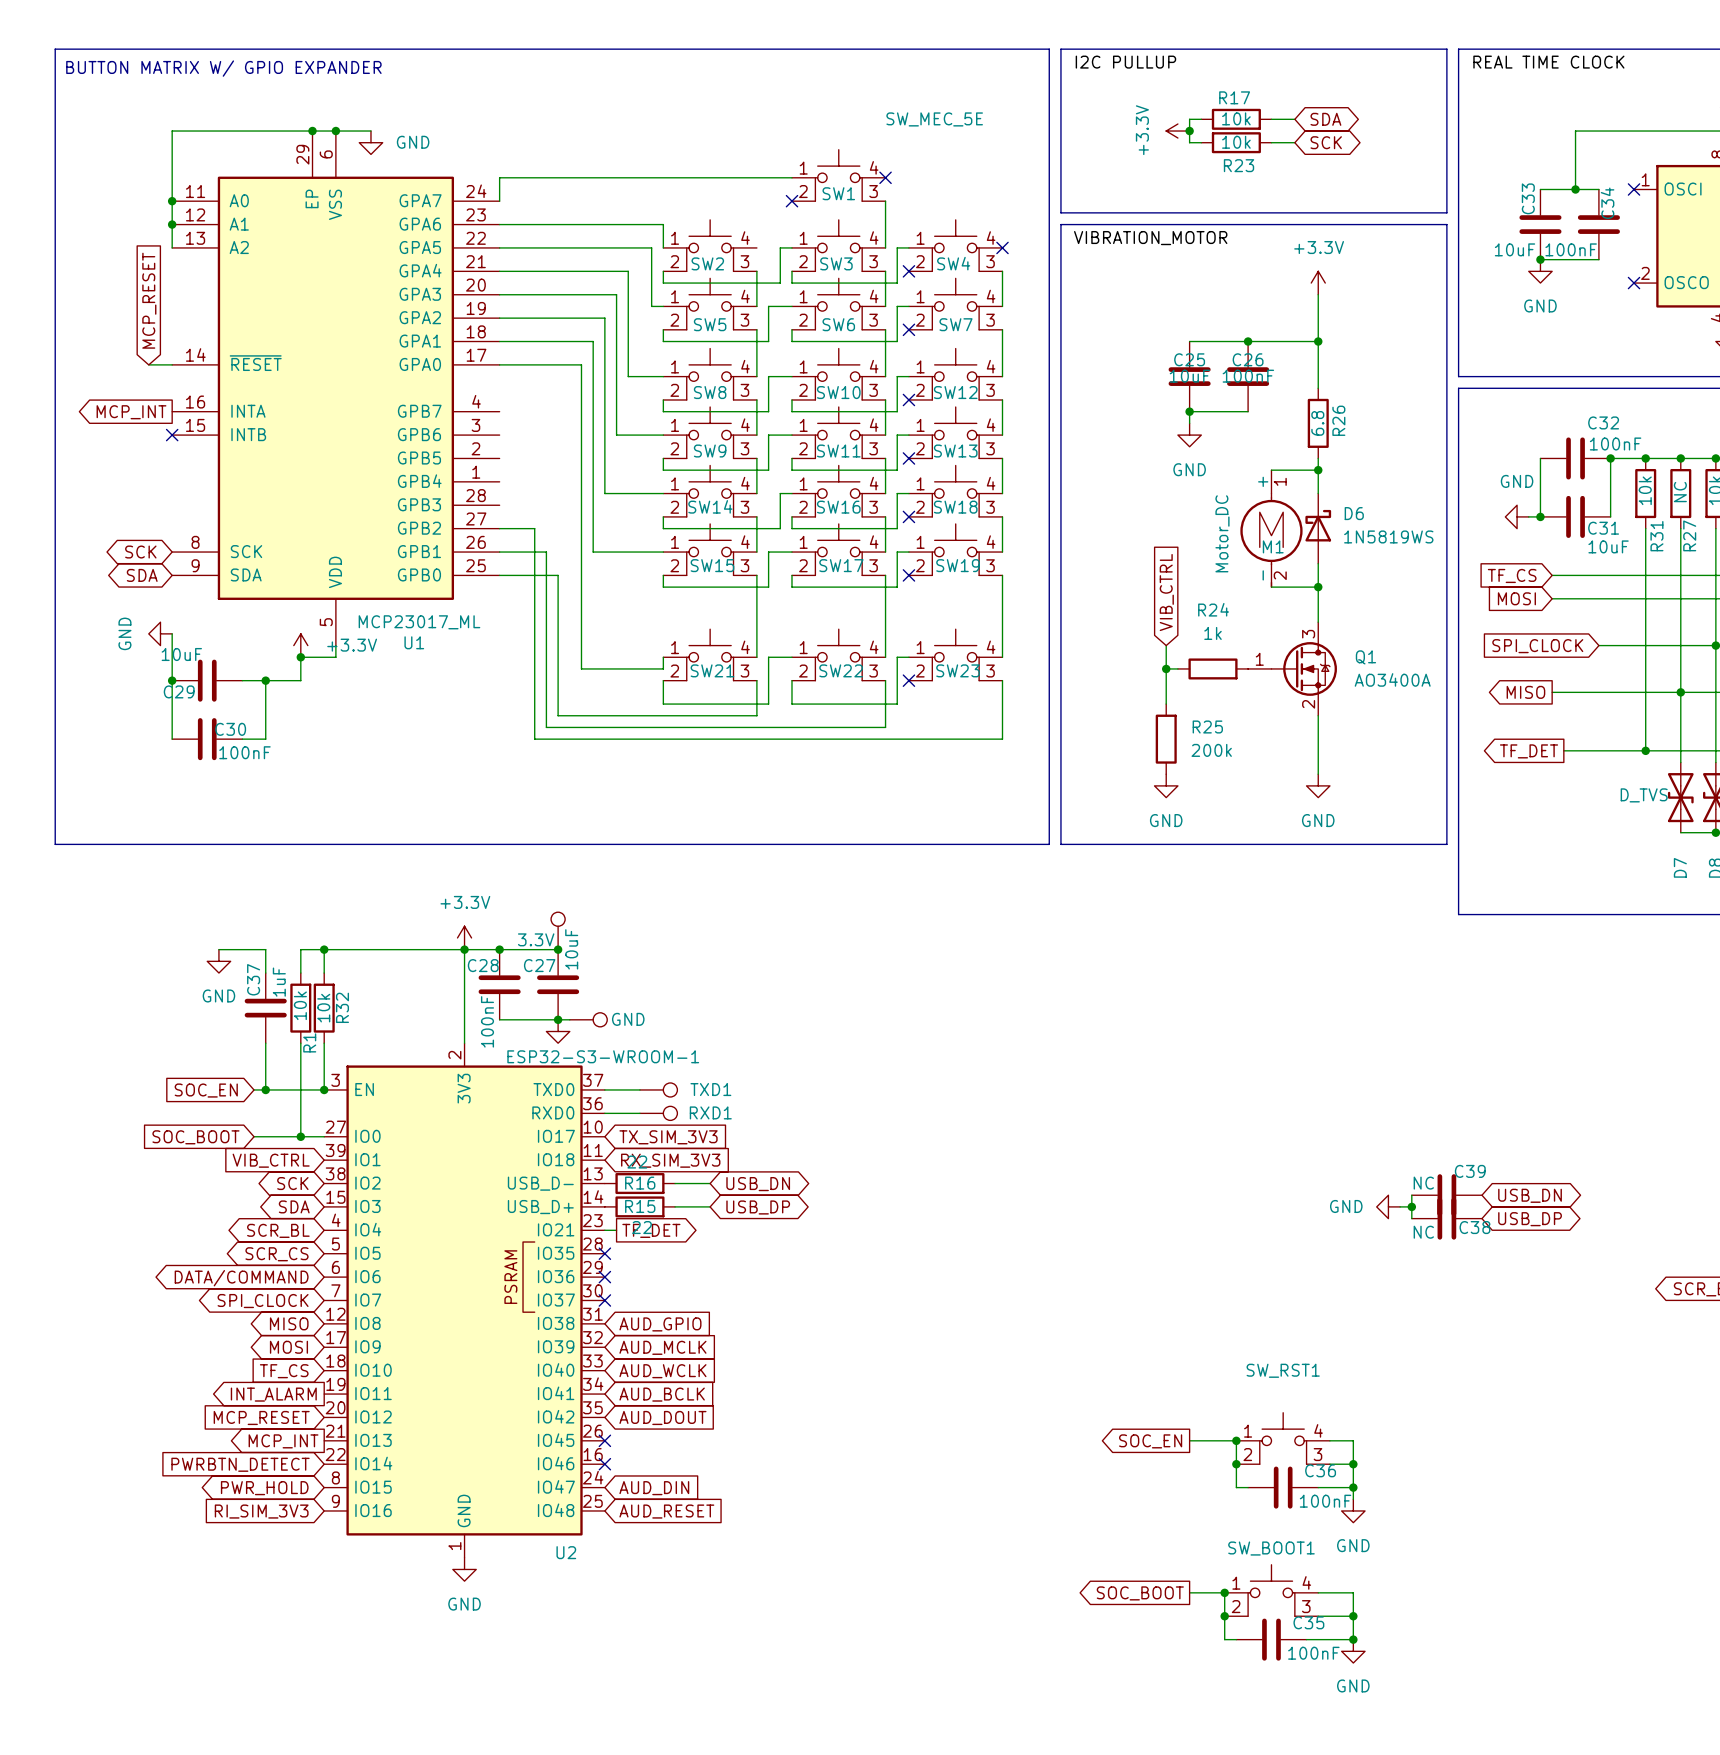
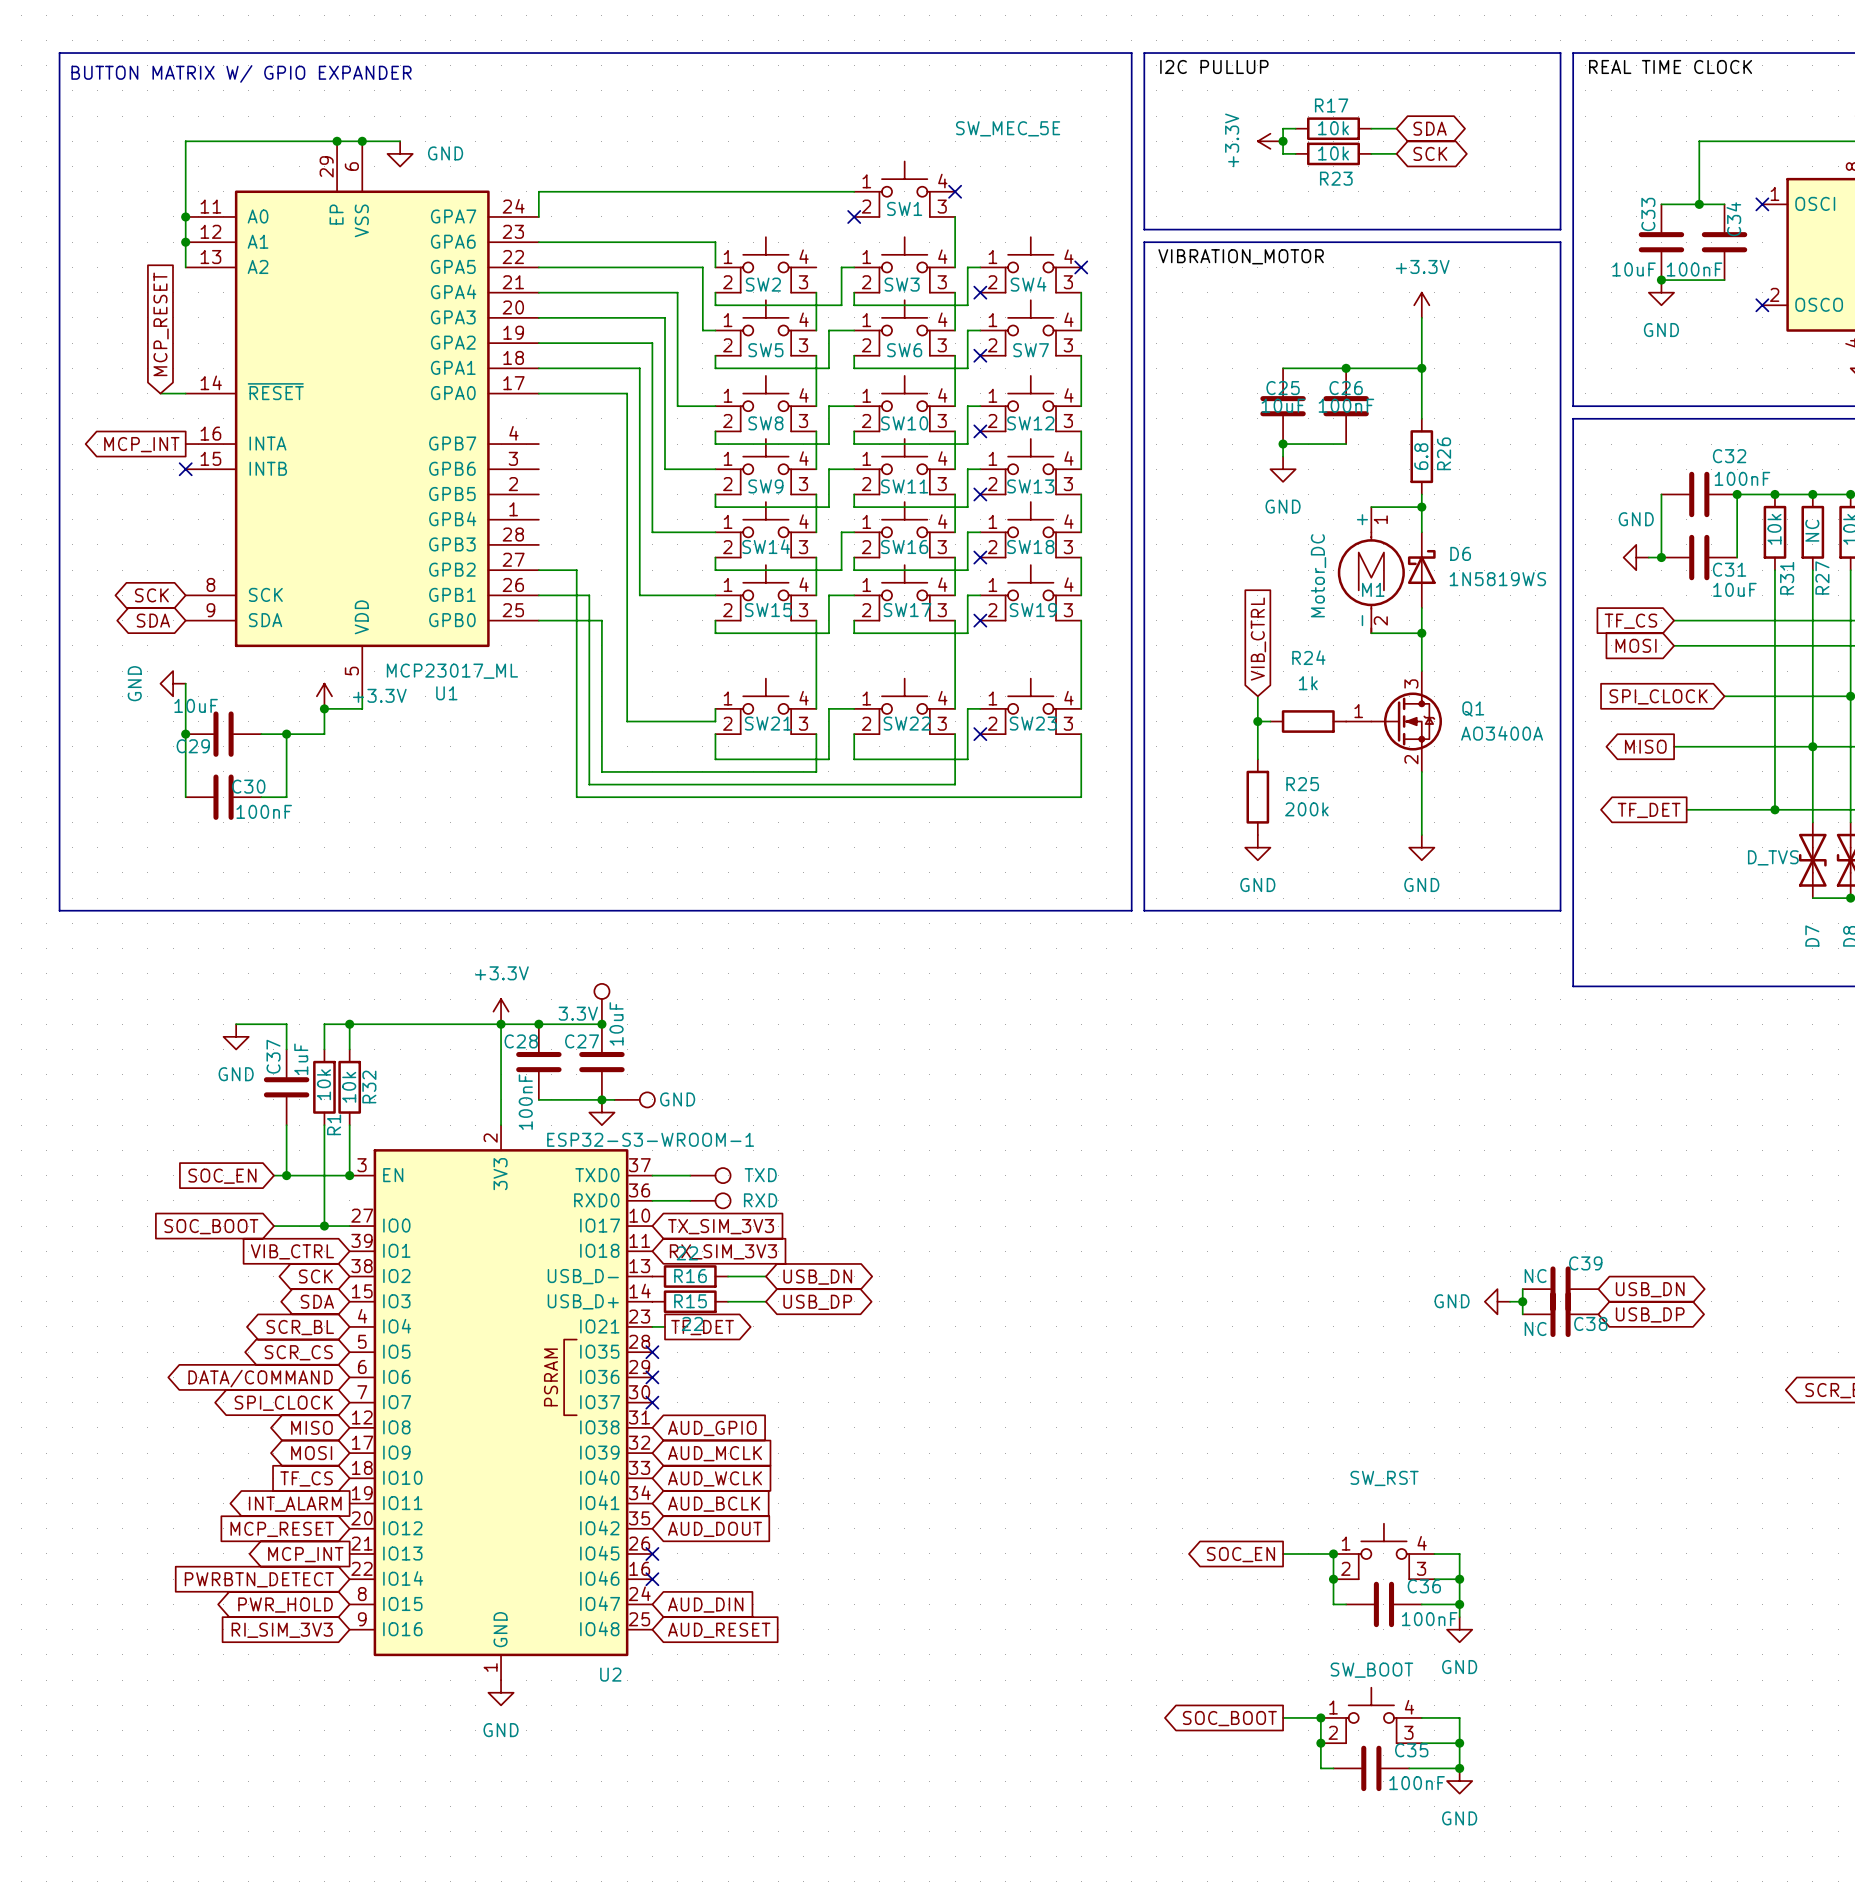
TXD1 name: TXD1 (710, 1089) -> TXD (760, 1175)
RXD1 name: RXD1 (710, 1112) -> RXD (760, 1200)
SW_RST1 name: SW_RST1 (1283, 1370) -> SW_RST (1384, 1478)
SW_BOOT1 name: SW_BOOT1 (1271, 1548) -> SW_BOOT (1371, 1670)

